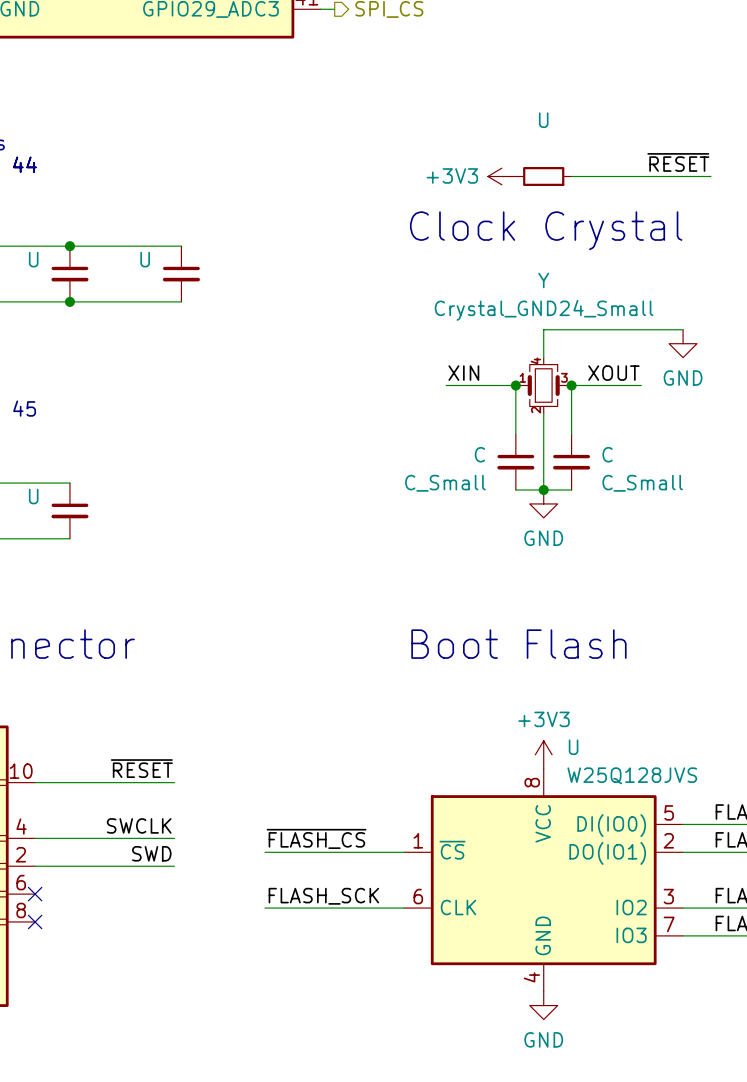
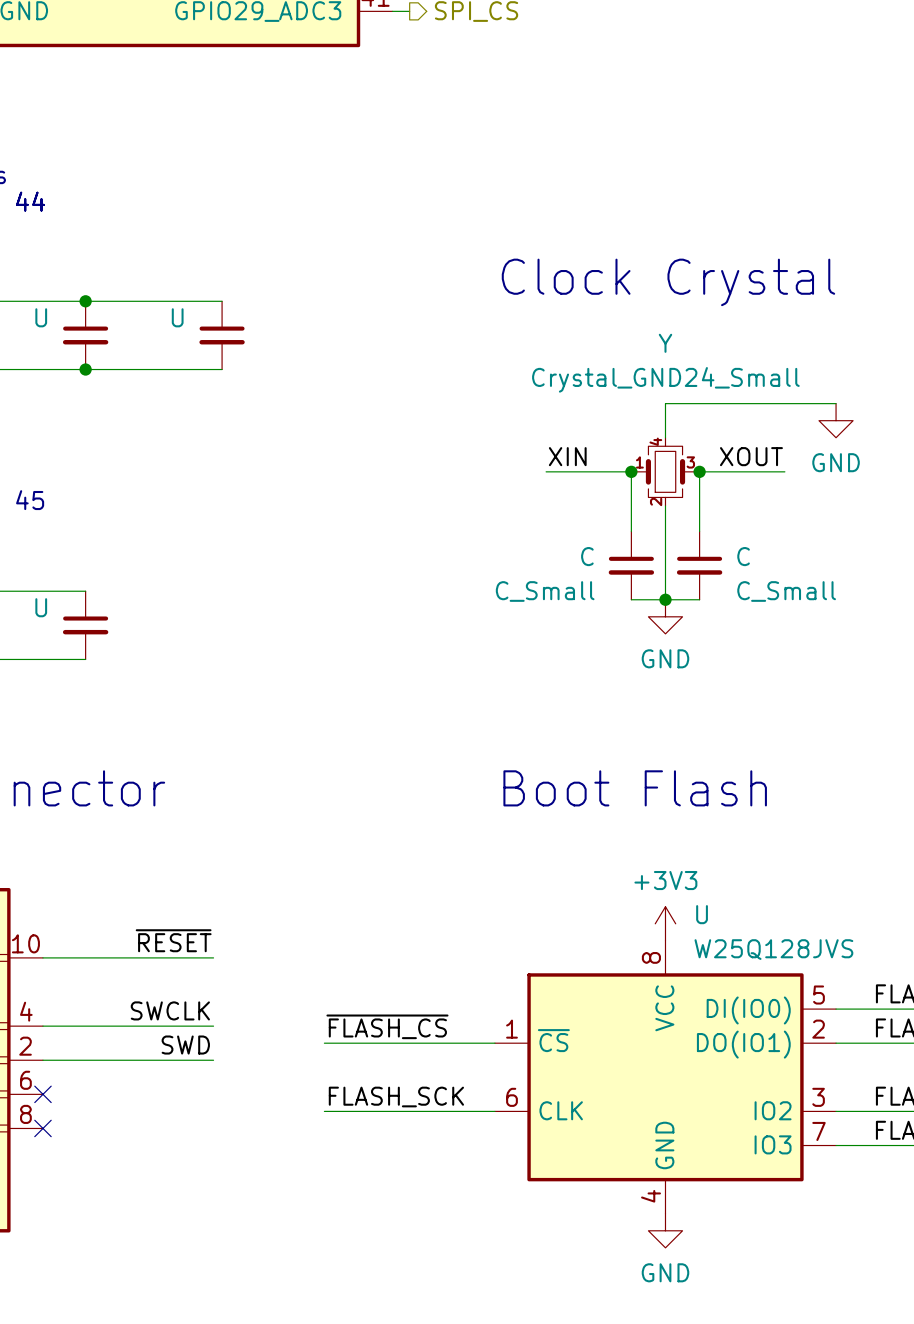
label: ~{RESET} (678, 162) -> none
power symbol: +3V3 (501, 176) -> none
U: (543, 176) -> none
wire: (571, 176) (710, 176) -> none

